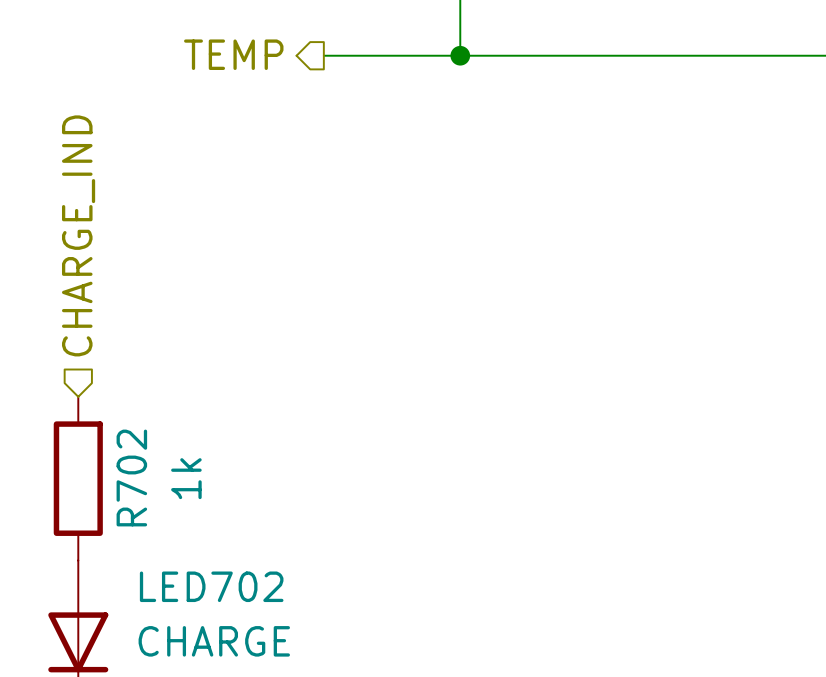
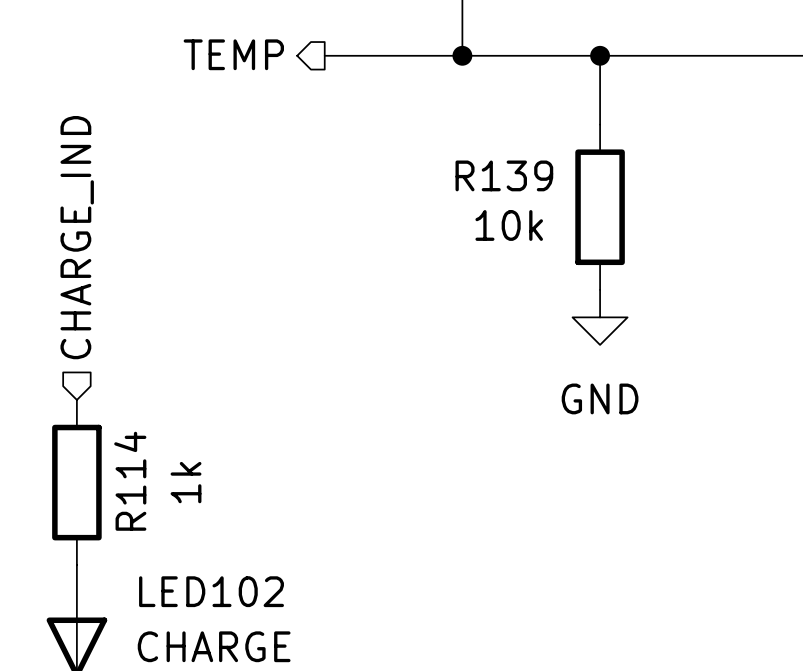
wire: none -> (600, 55) (600, 124)
junction: none -> (600, 55)
R139: none -> 10k (600, 207)
power symbol: none -> GND (600, 317)
R702 name: R702 (131, 478) -> R114 (130, 481)
LED702 name: LED702 (211, 586) -> LED102 (211, 591)

